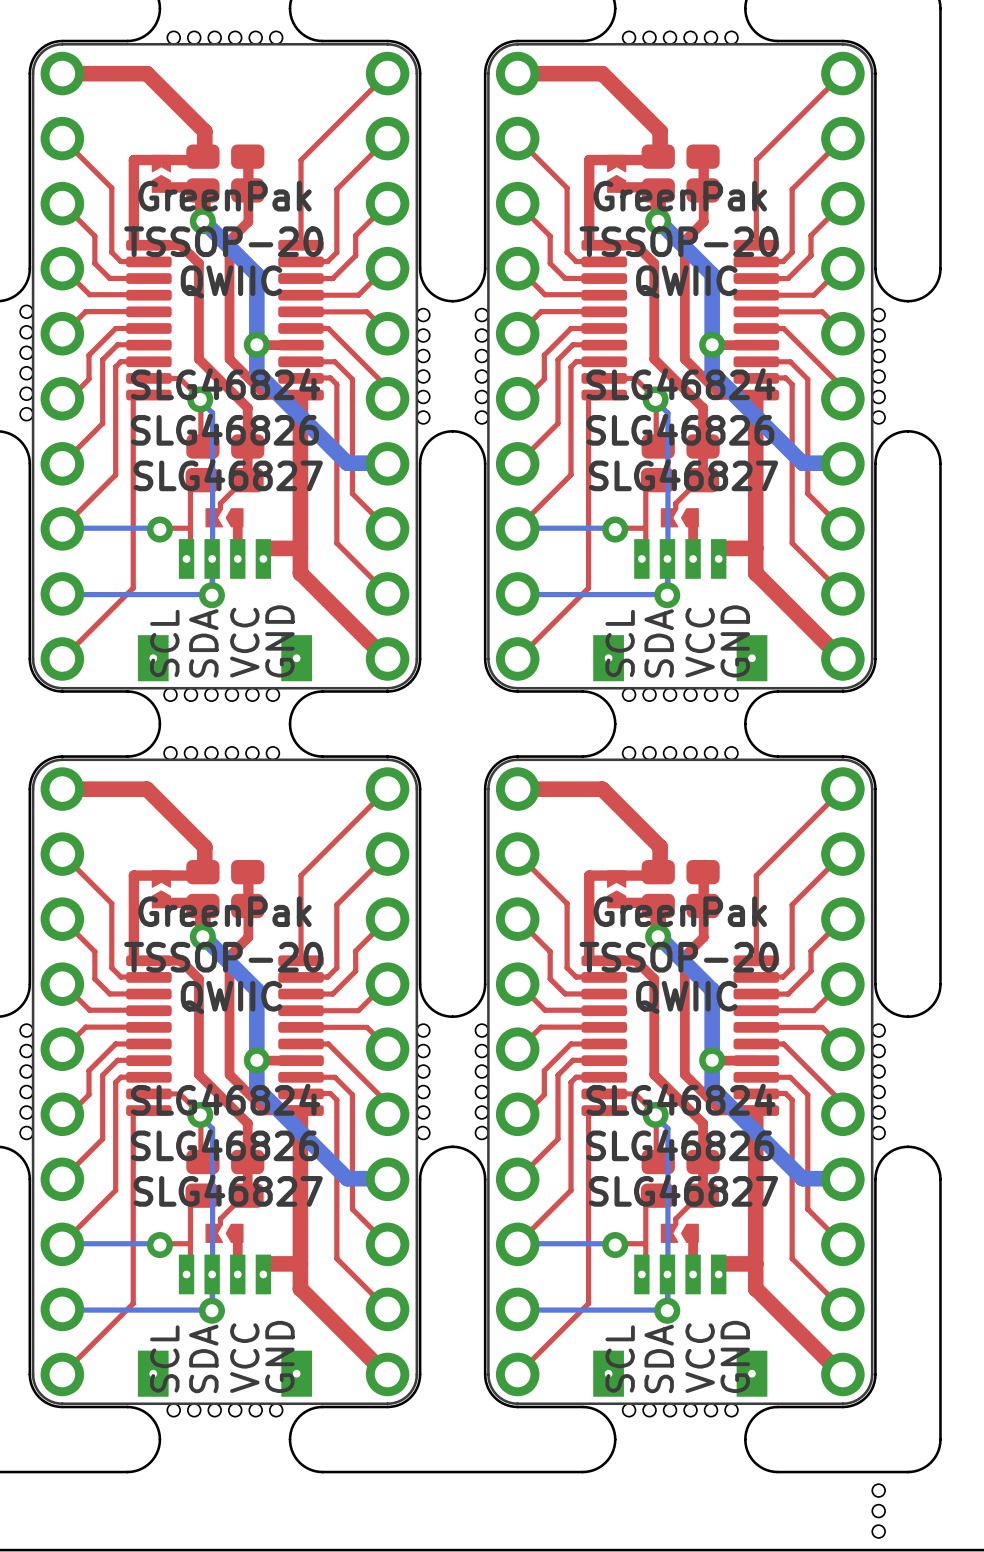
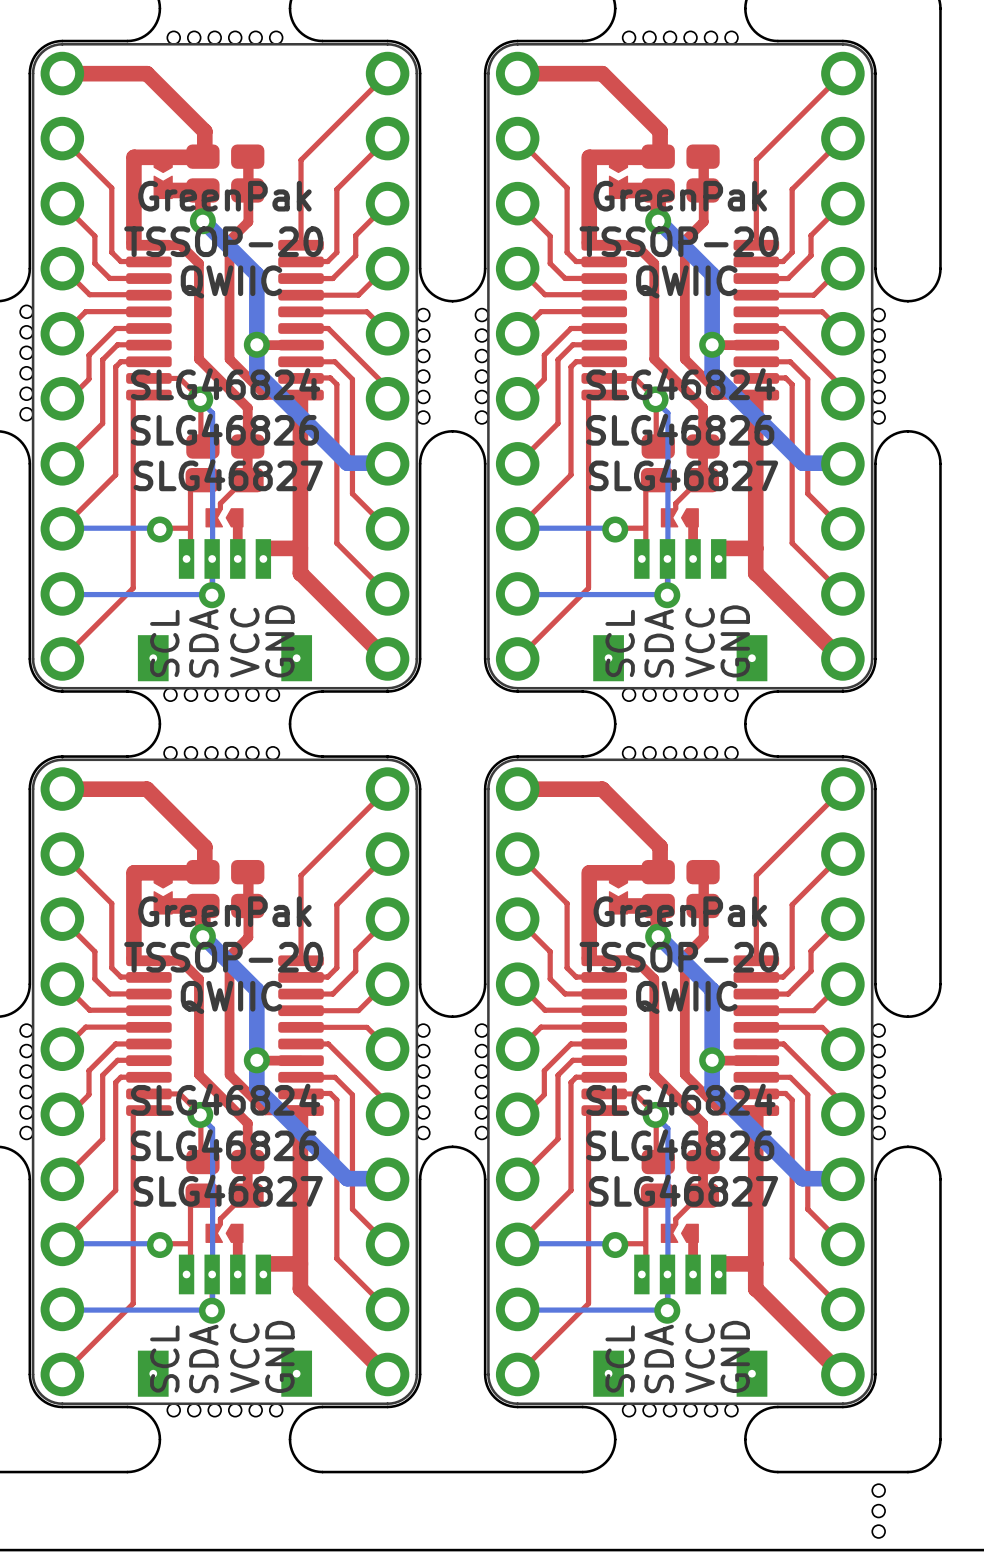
part footprint: [31, 43, 419, 690] -> [31, 43, 419, 690]
part footprint: [487, 43, 874, 690] -> [487, 43, 874, 690]
part footprint: [31, 758, 419, 1406] -> [31, 758, 419, 1406]
part footprint: [487, 758, 874, 1406] -> [487, 758, 874, 1406]

